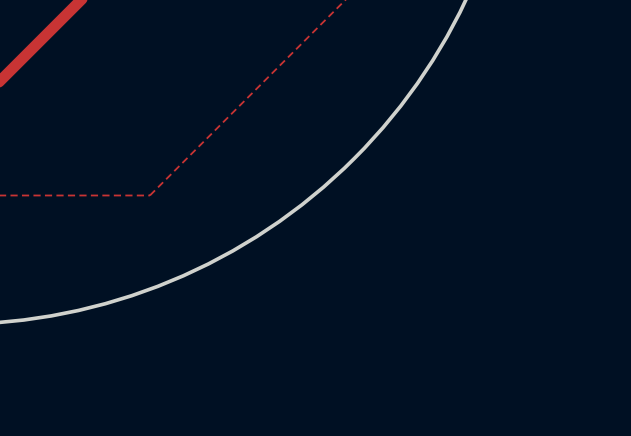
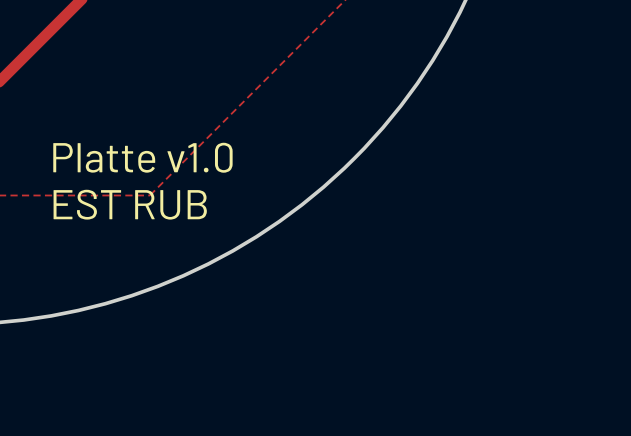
text: none -> Platte v1.0 (142, 157)
text: none -> EST RUB (130, 204)

